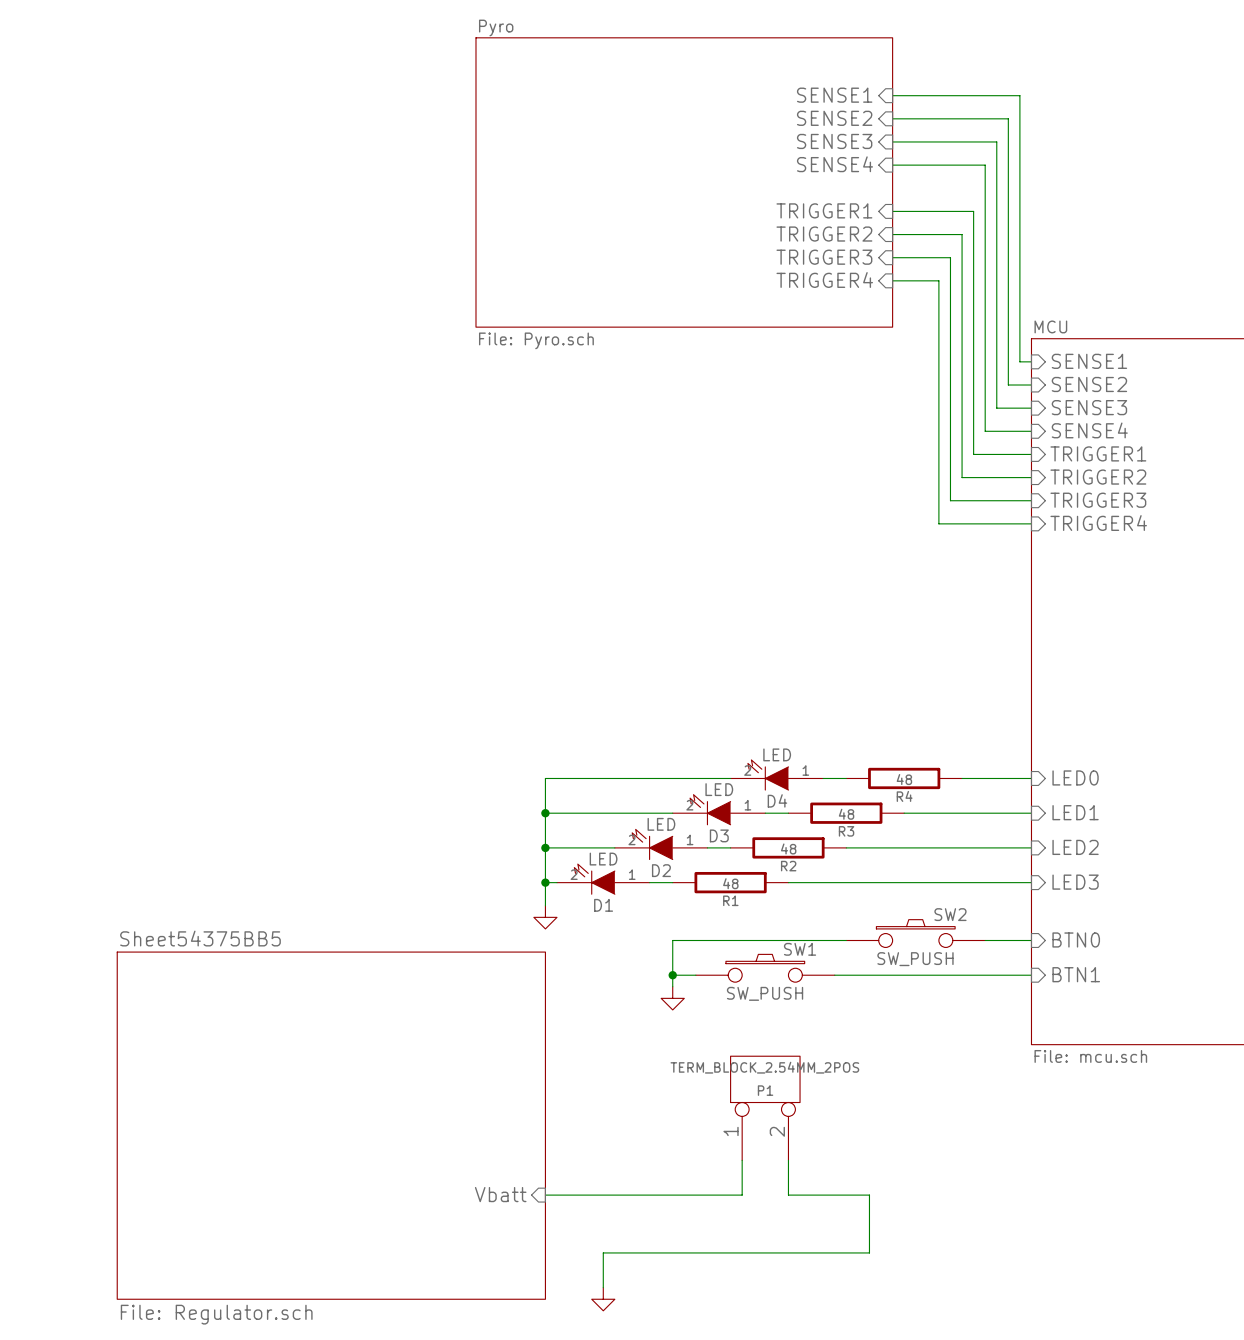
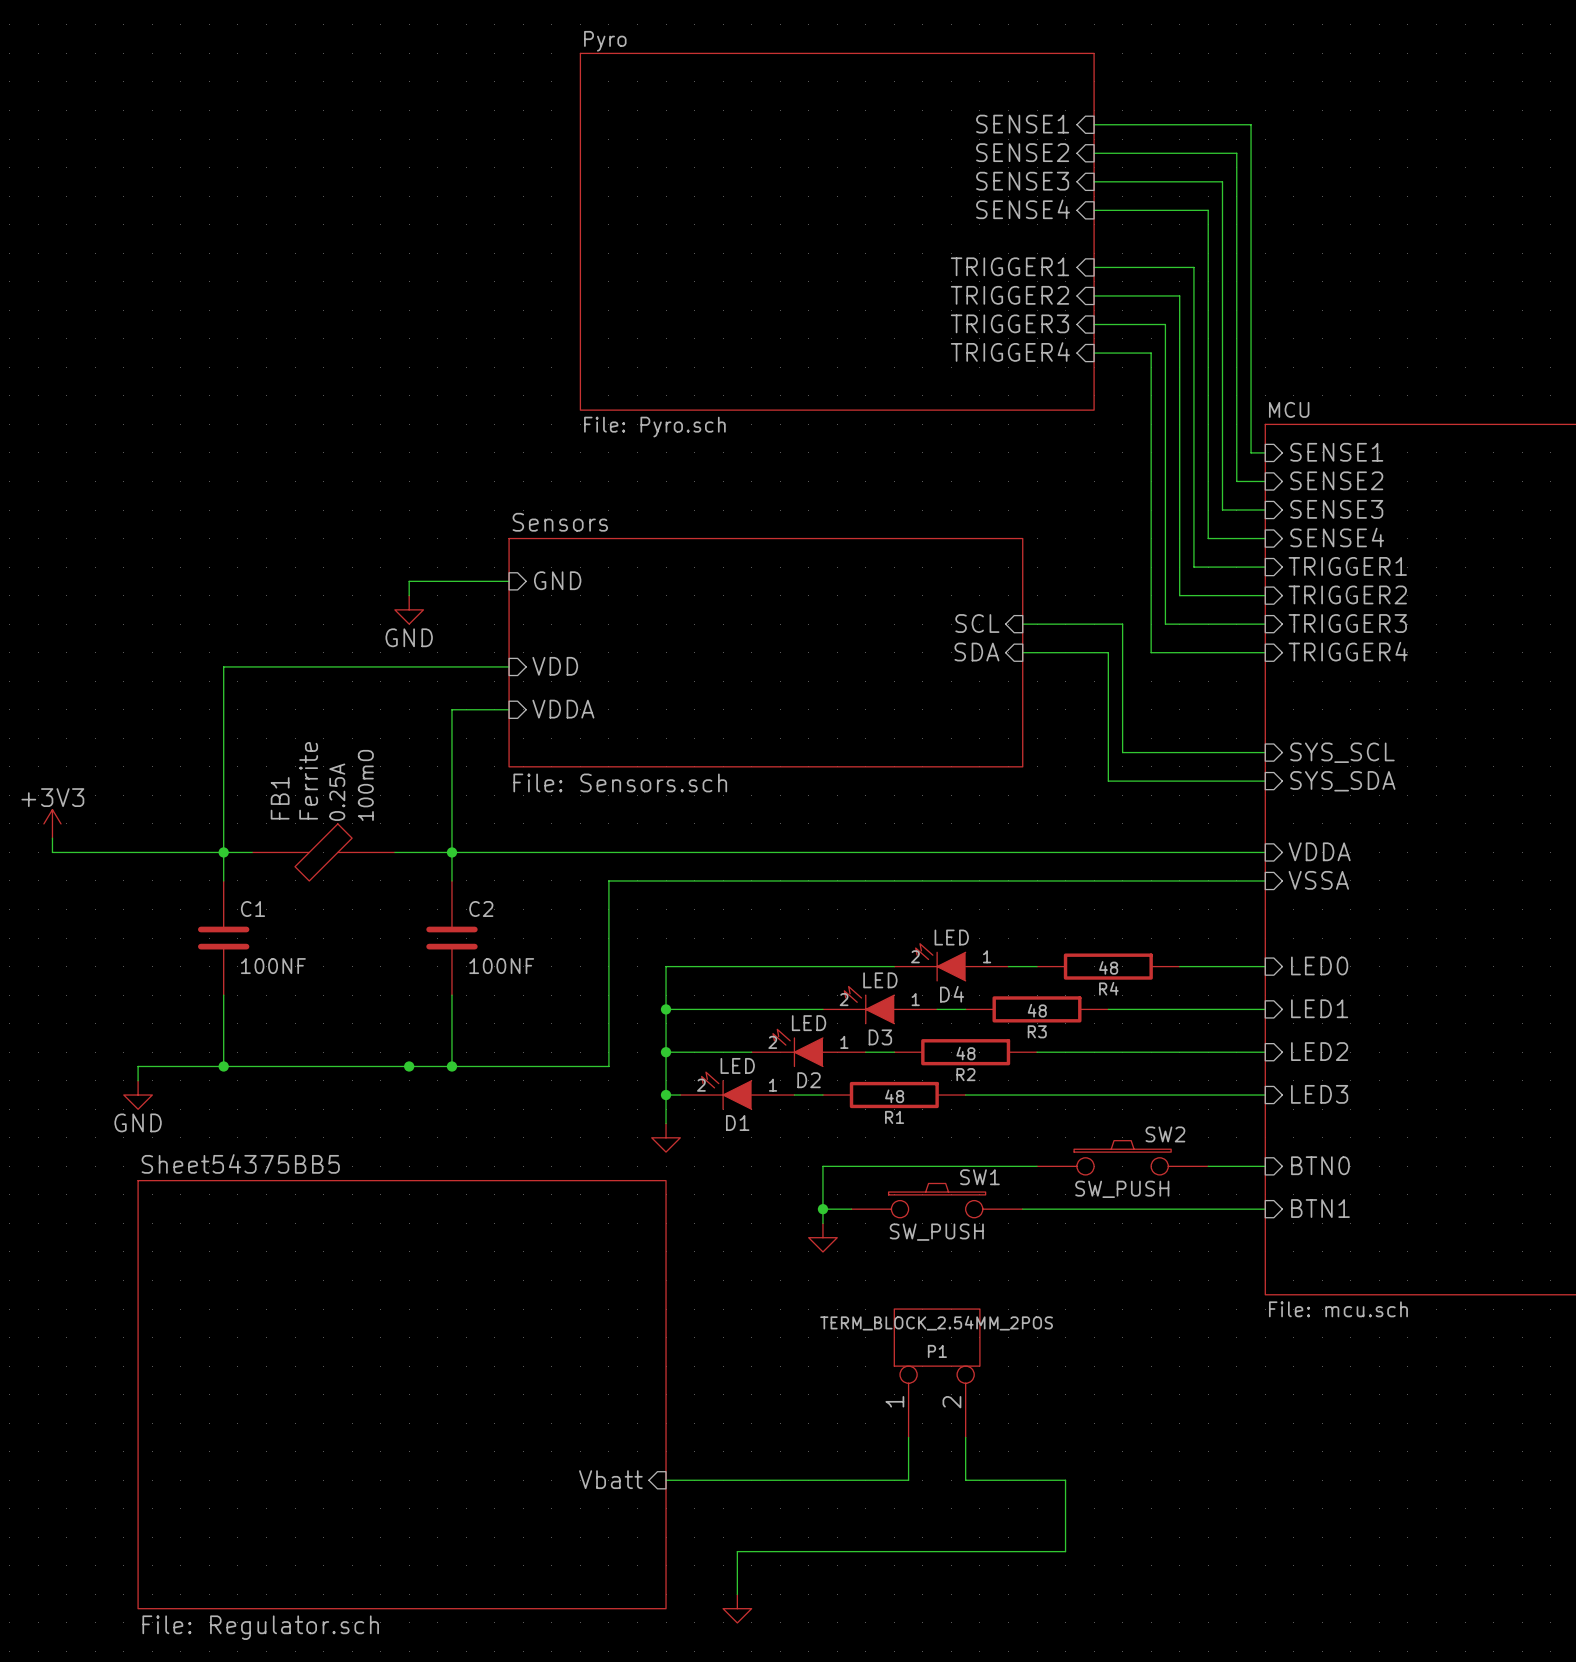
sheet pin: none -> GND (557, 580)
wire: none -> (509, 581) (409, 581) (409, 595)
power symbol: none -> GND (409, 609)
sheet pin: none -> SCL (977, 623)
wire: none -> (1022, 624) (1122, 624) (1122, 752) (1265, 752)
sheet Sensors: none -> File: Sensors.sch (765, 652)
sheet pin: none -> SDA (976, 652)
wire: none -> (1022, 652) (1108, 652) (1108, 781) (1265, 781)
sheet pin: none -> VDD (555, 666)
wire: none -> (509, 666) (223, 666) (223, 880)
sheet pin: none -> VDDA (563, 709)
wire: none -> (509, 709) (451, 709) (451, 880)
sheet pin: none -> SYS_SCL (1342, 752)
sheet pin: none -> SYS_SDA (1342, 781)
power symbol: none -> +3V3 (52, 823)
wire: none -> (52, 838) (52, 852) (252, 852)
junction: none -> (223, 852)
FB1: none -> Ferrite (323, 852)
wire: none -> (394, 852) (1265, 852)
junction: none -> (451, 852)
sheet pin: none -> VDDA (1319, 851)
sheet pin: none -> VSSA (1318, 880)
wire: none -> (1265, 880) (608, 880) (608, 1066) (138, 1066) (138, 1080)
C1: none -> 100NF (223, 938)
C2: none -> 100NF (451, 938)
wire: none -> (223, 995) (223, 1066)
wire: none -> (451, 995) (451, 1066)
junction: none -> (223, 1066)
junction: none -> (409, 1066)
junction: none -> (451, 1066)
power symbol: none -> GND (138, 1095)

